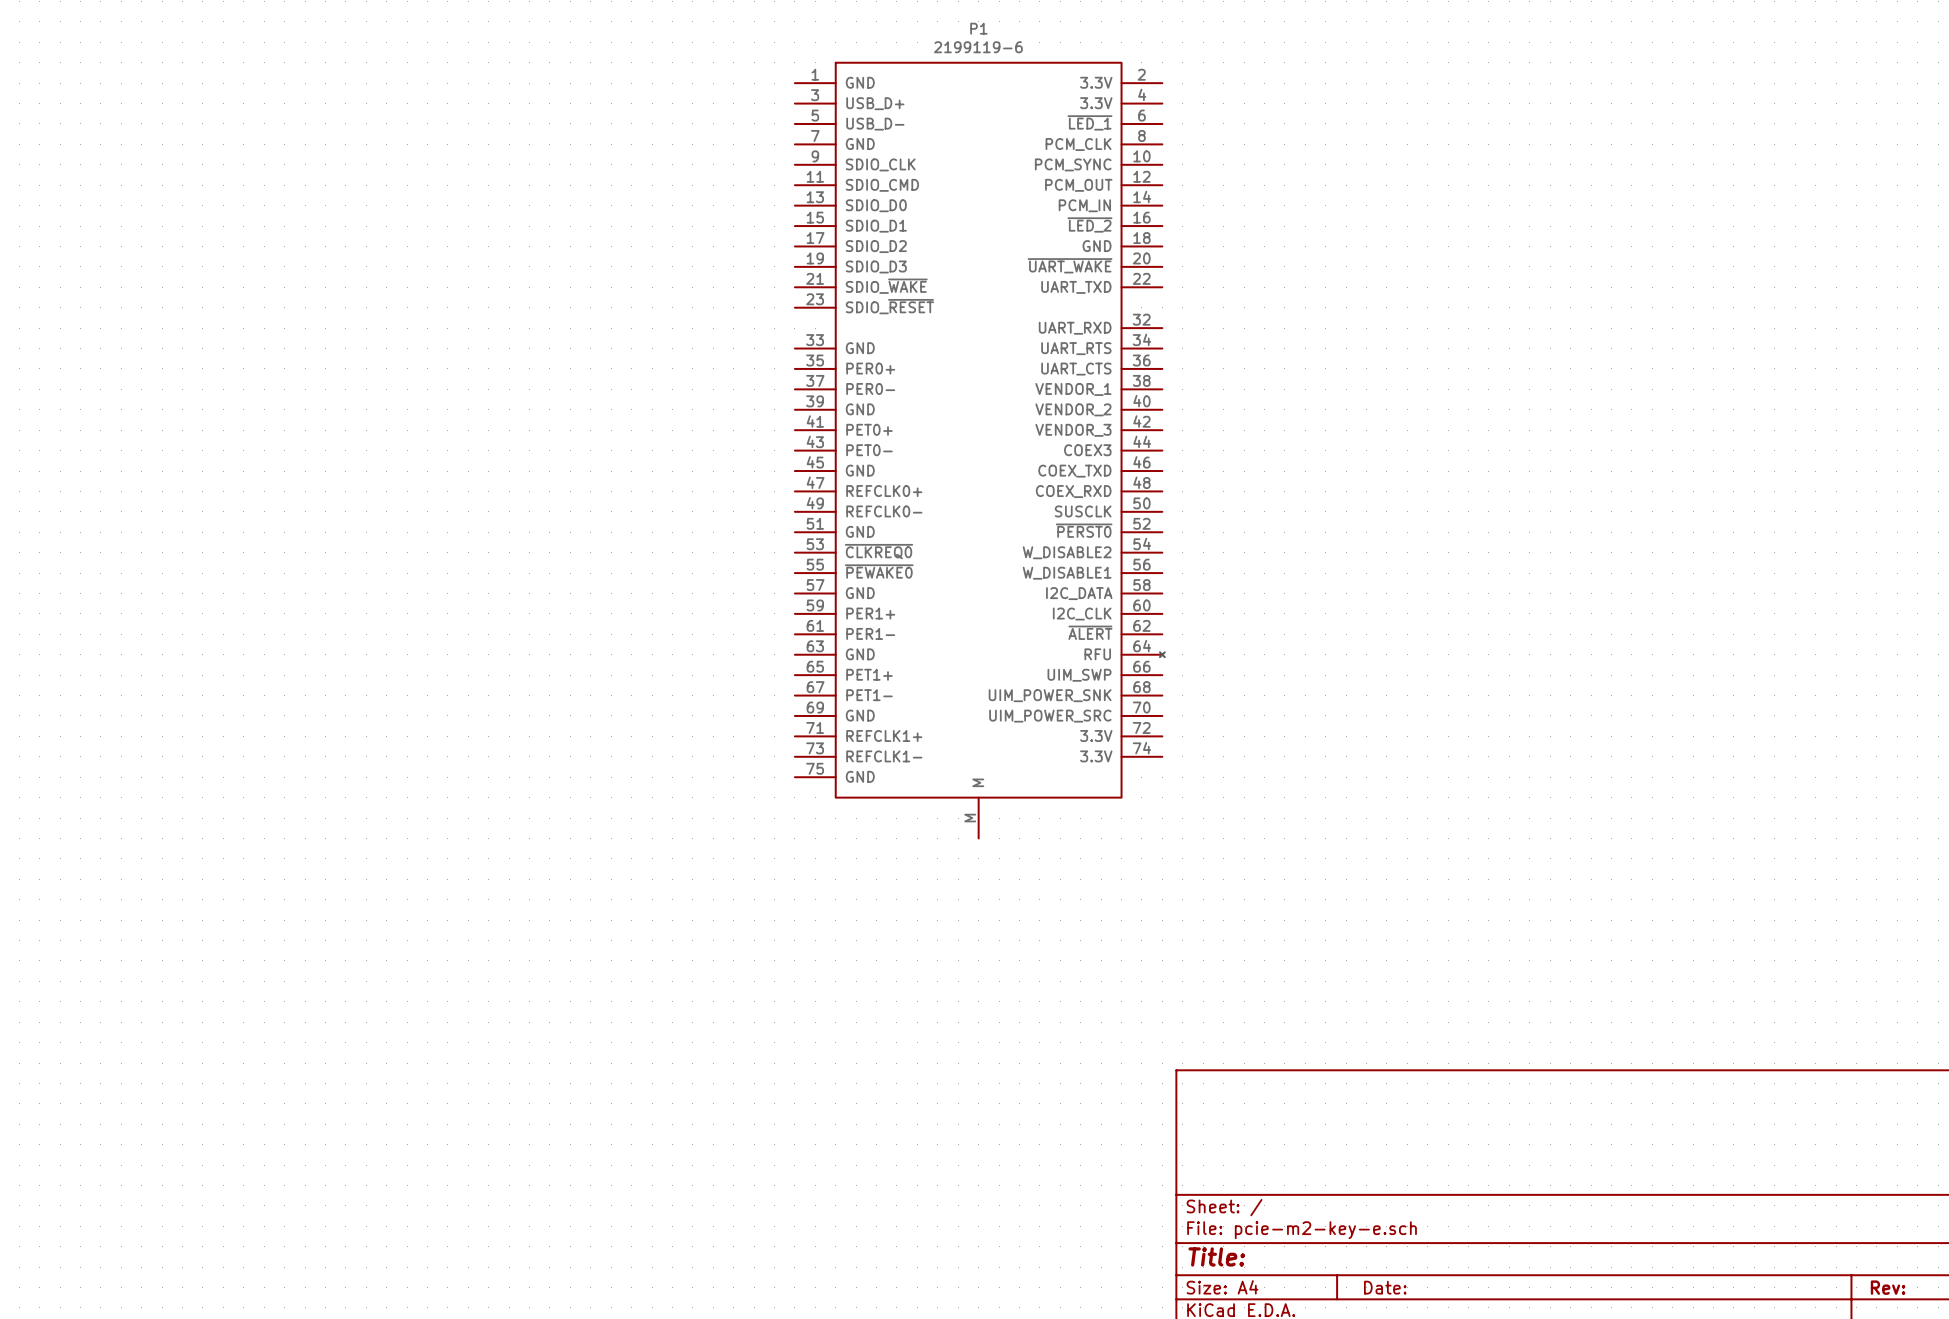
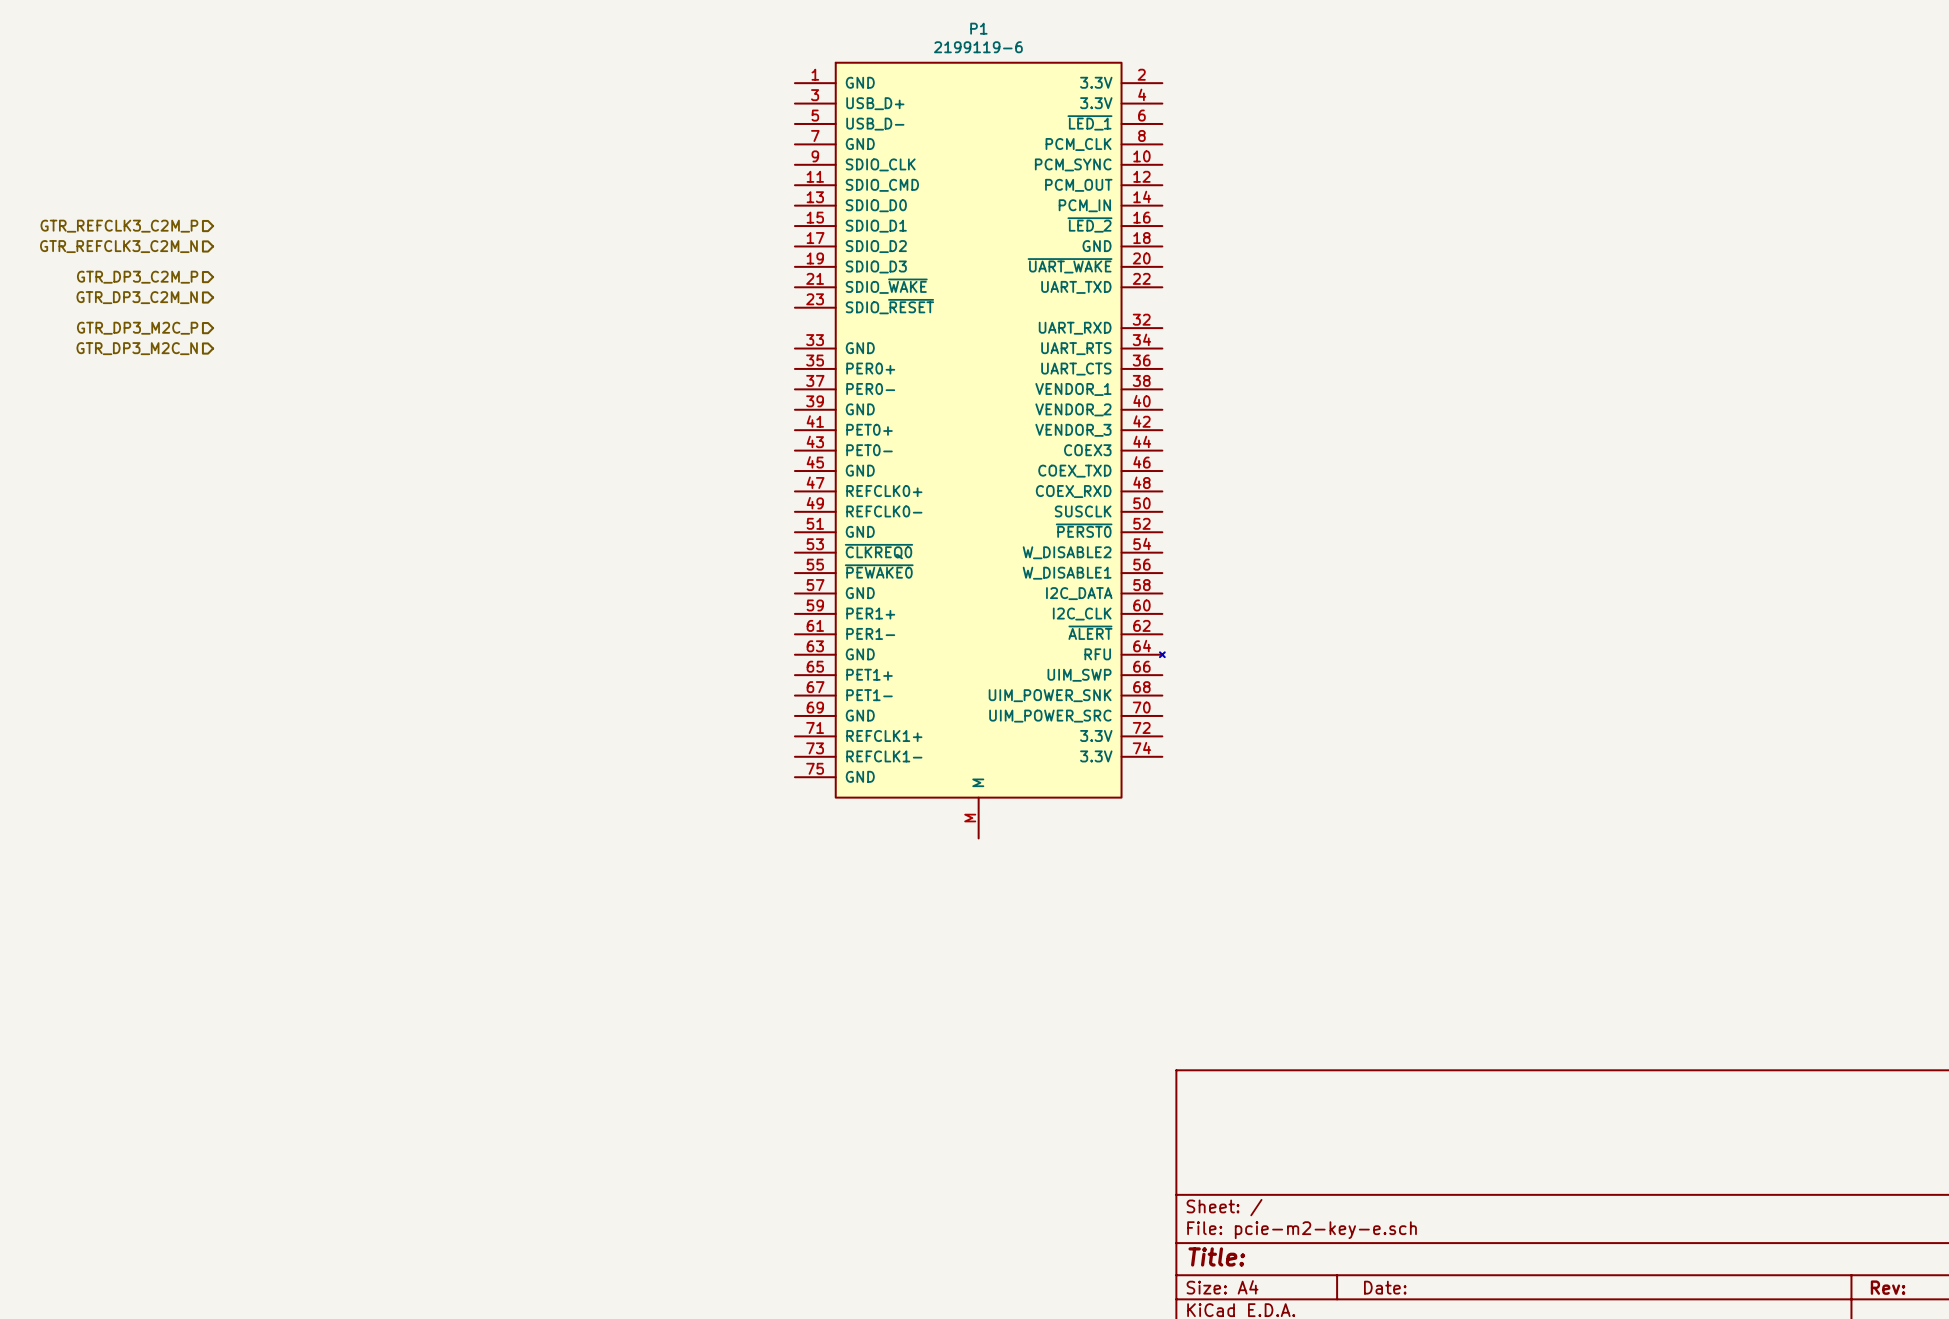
hierarchical label: none -> GTR_REFCLK3_C2M_P (119, 226)
hierarchical label: none -> GTR_REFCLK3_C2M_N (118, 246)
hierarchical label: none -> GTR_DP3_C2M_P (137, 277)
hierarchical label: none -> GTR_DP3_C2M_N (137, 297)
hierarchical label: none -> GTR_DP3_M2C_P (137, 328)
hierarchical label: none -> GTR_DP3_M2C_N (137, 348)

